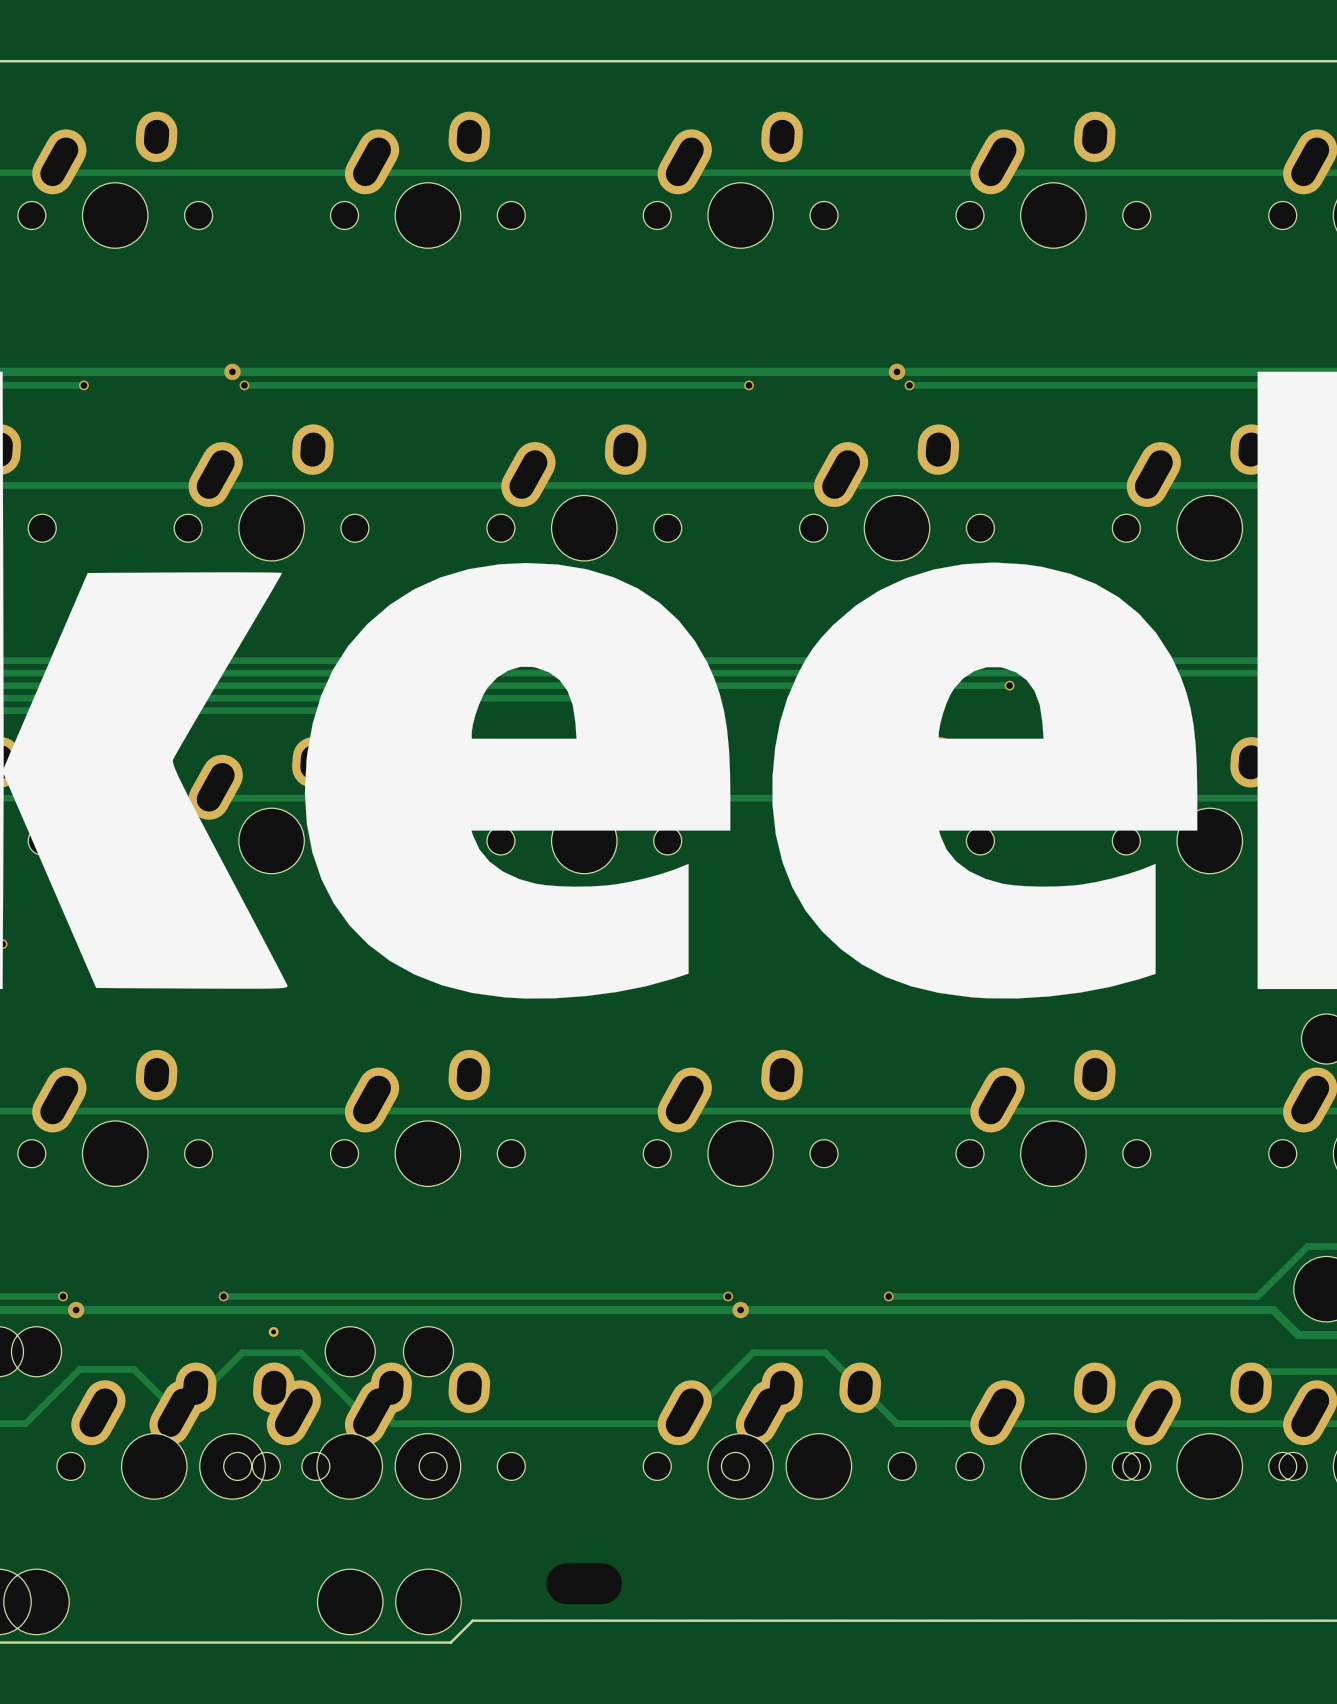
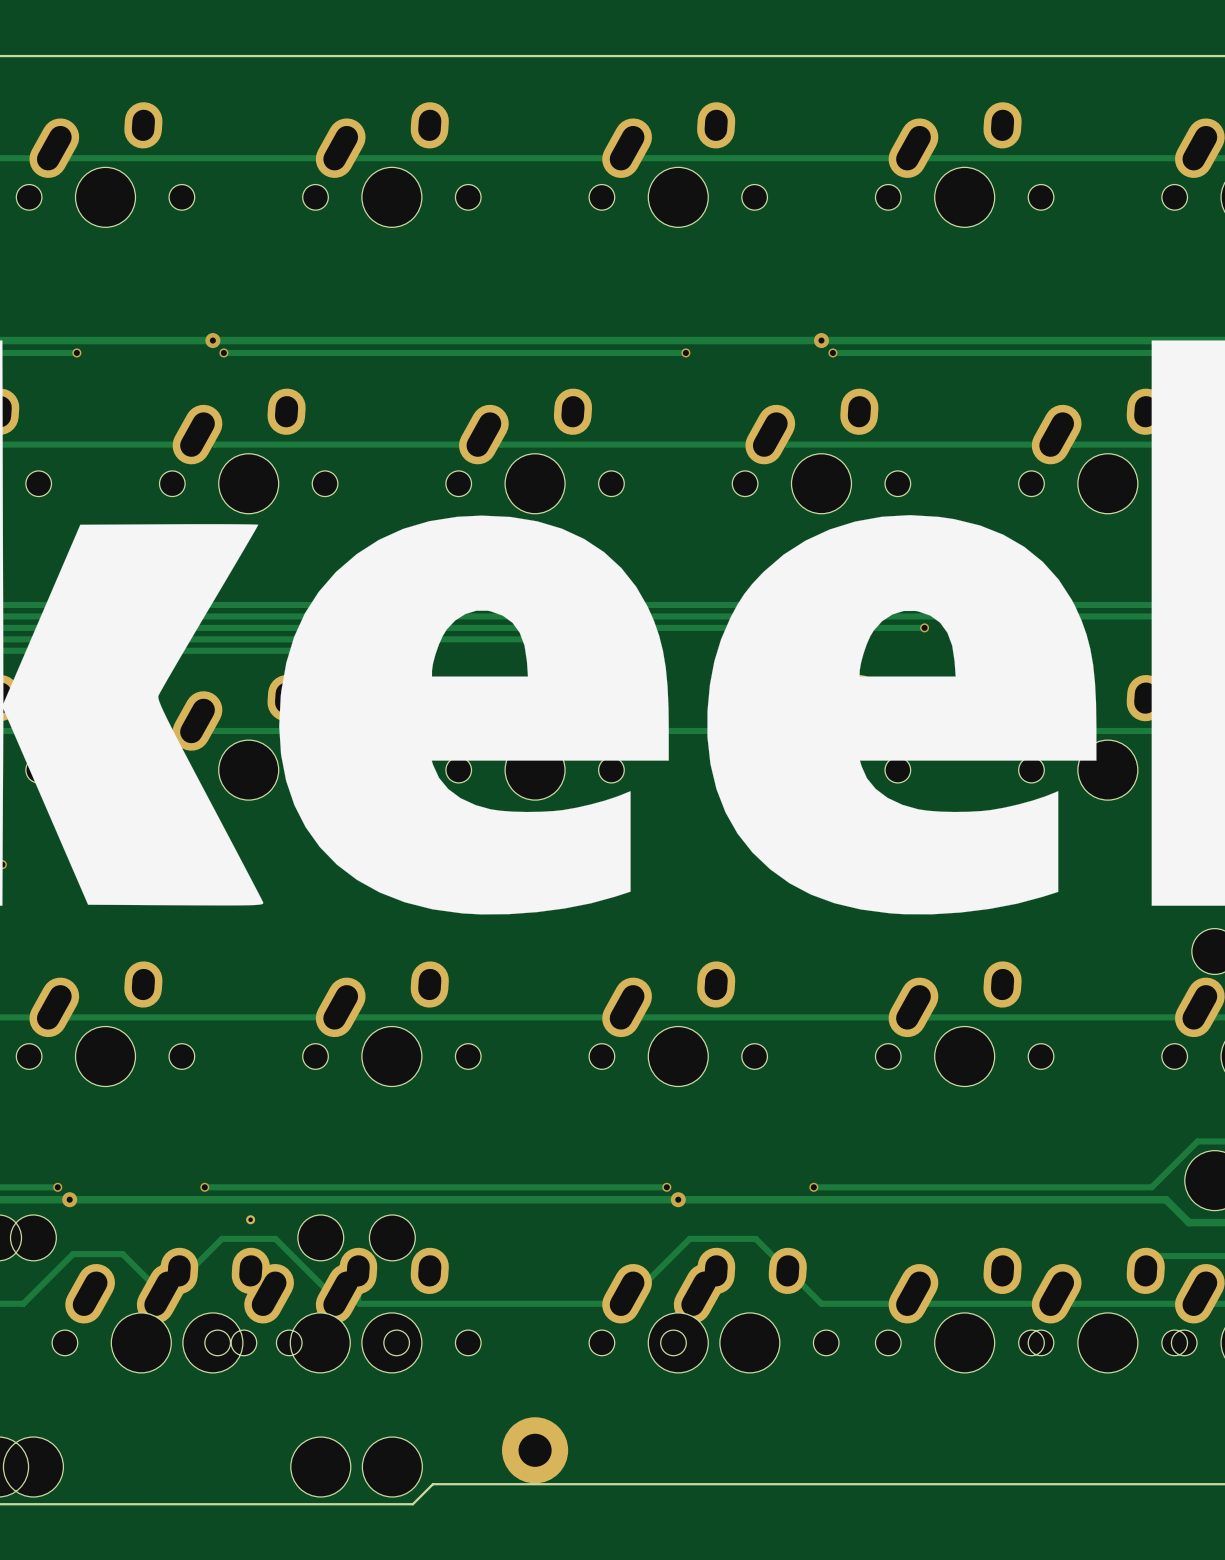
part footprint: [546, 1563, 623, 1605] -> [502, 1417, 569, 1484]

